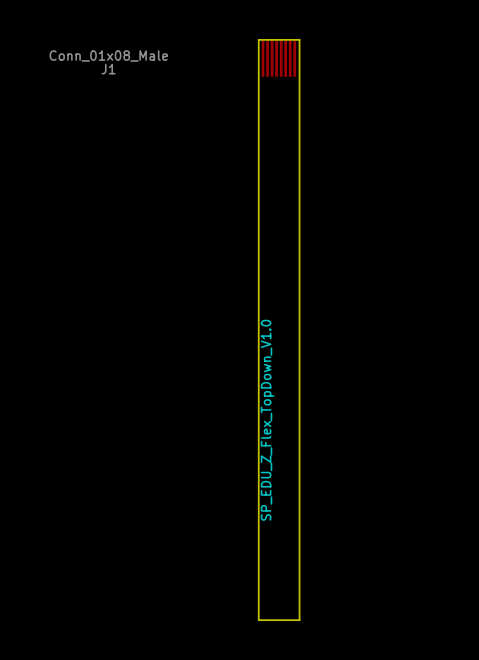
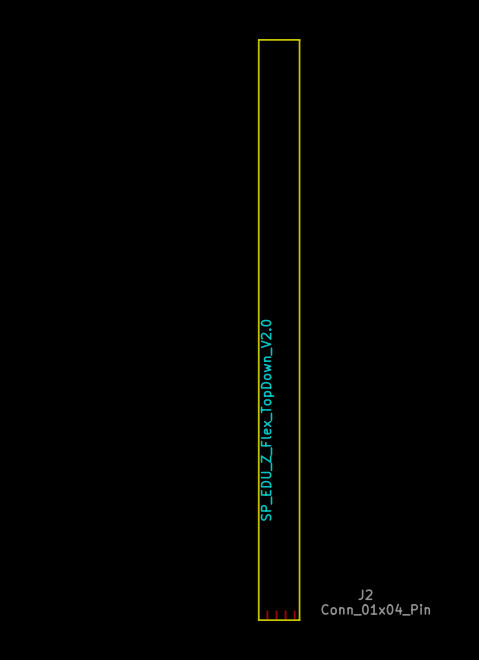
J1: Conn_01x08_Male (278, 58) -> none
text: SP_EDU_Z_Flex_TopDown_V1.0 (267, 420) -> SP_EDU_Z_Flex_TopDown_V2.0 (267, 420)
J2: none -> Conn_01x04_Pin (281, 614)

